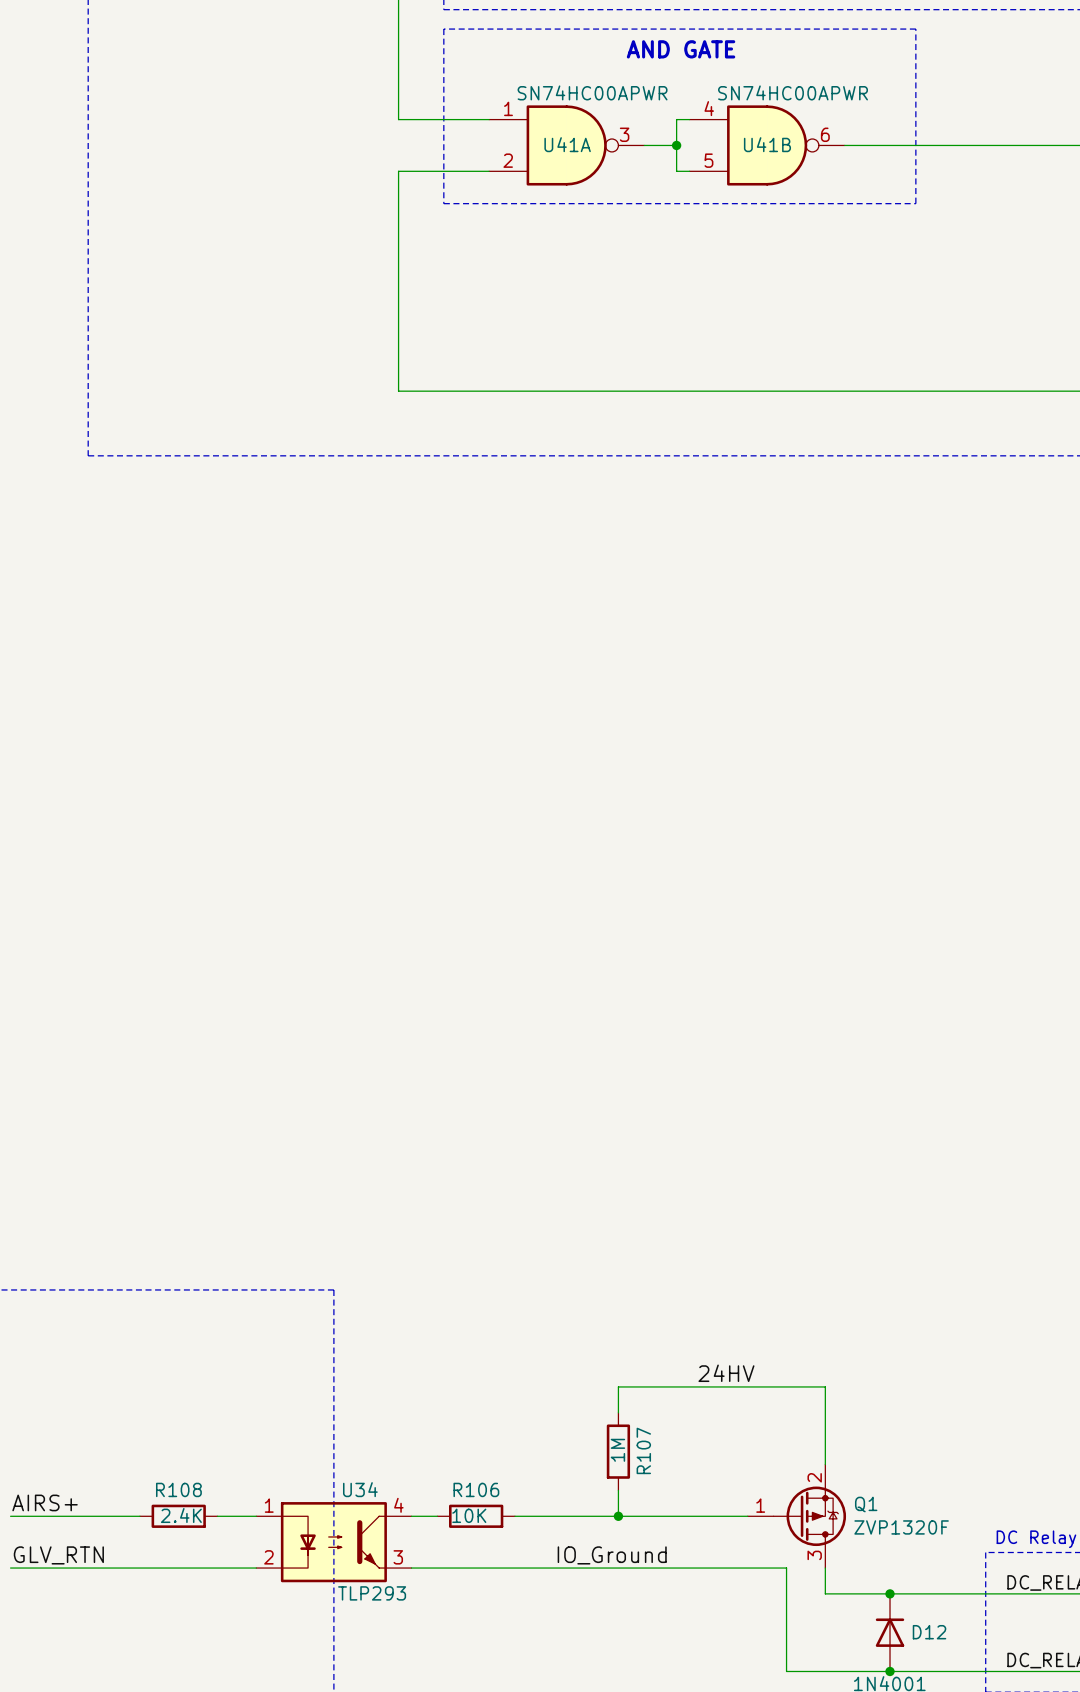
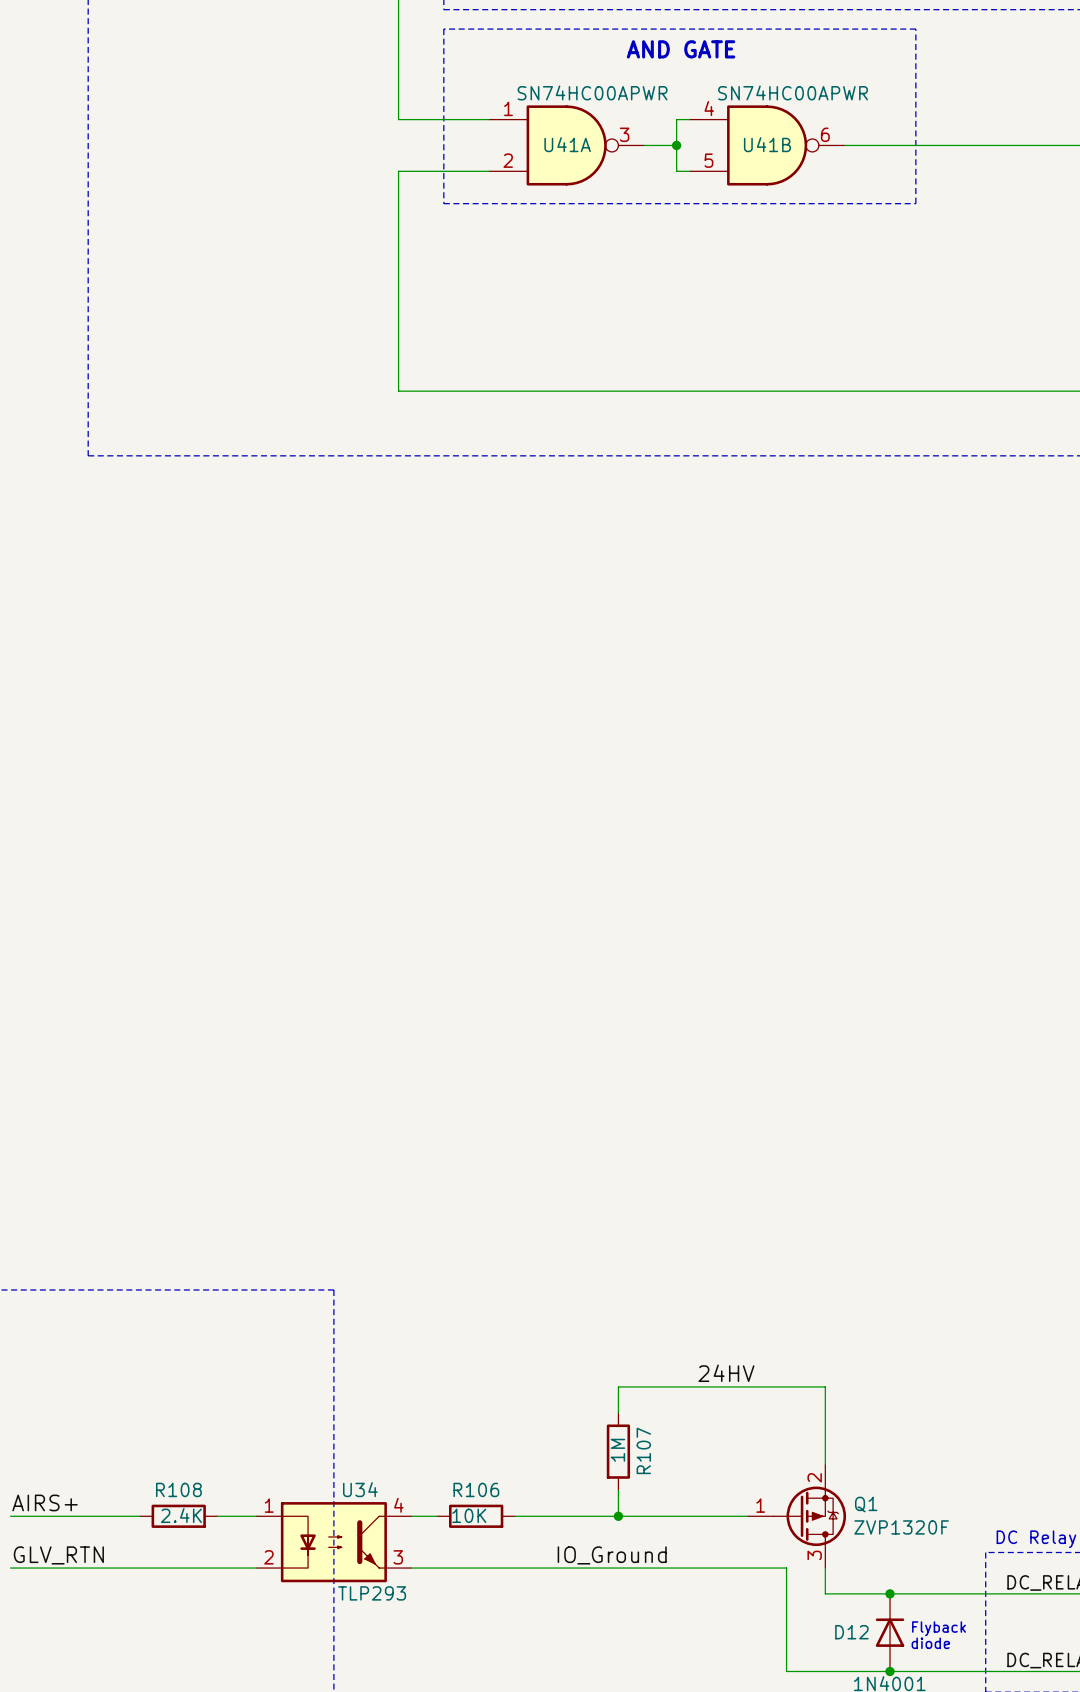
text: none -> Flyback (939, 1628)
D12 name position: D12 (929, 1632) -> D12 (851, 1632)
text: none -> diode (930, 1643)

